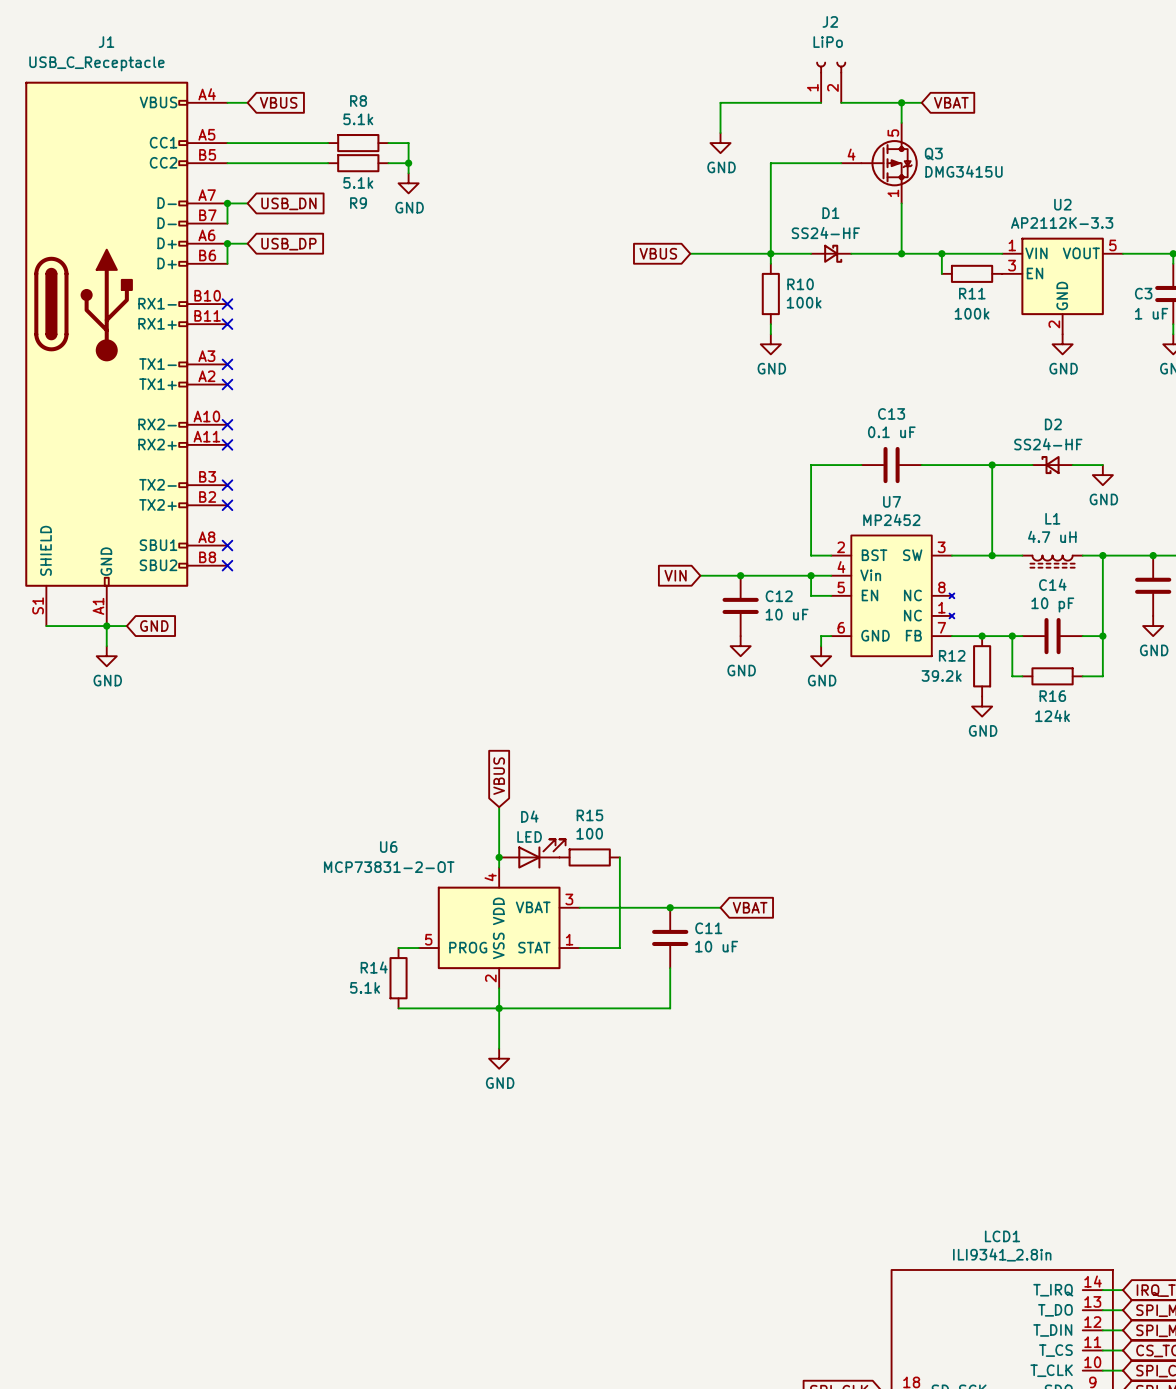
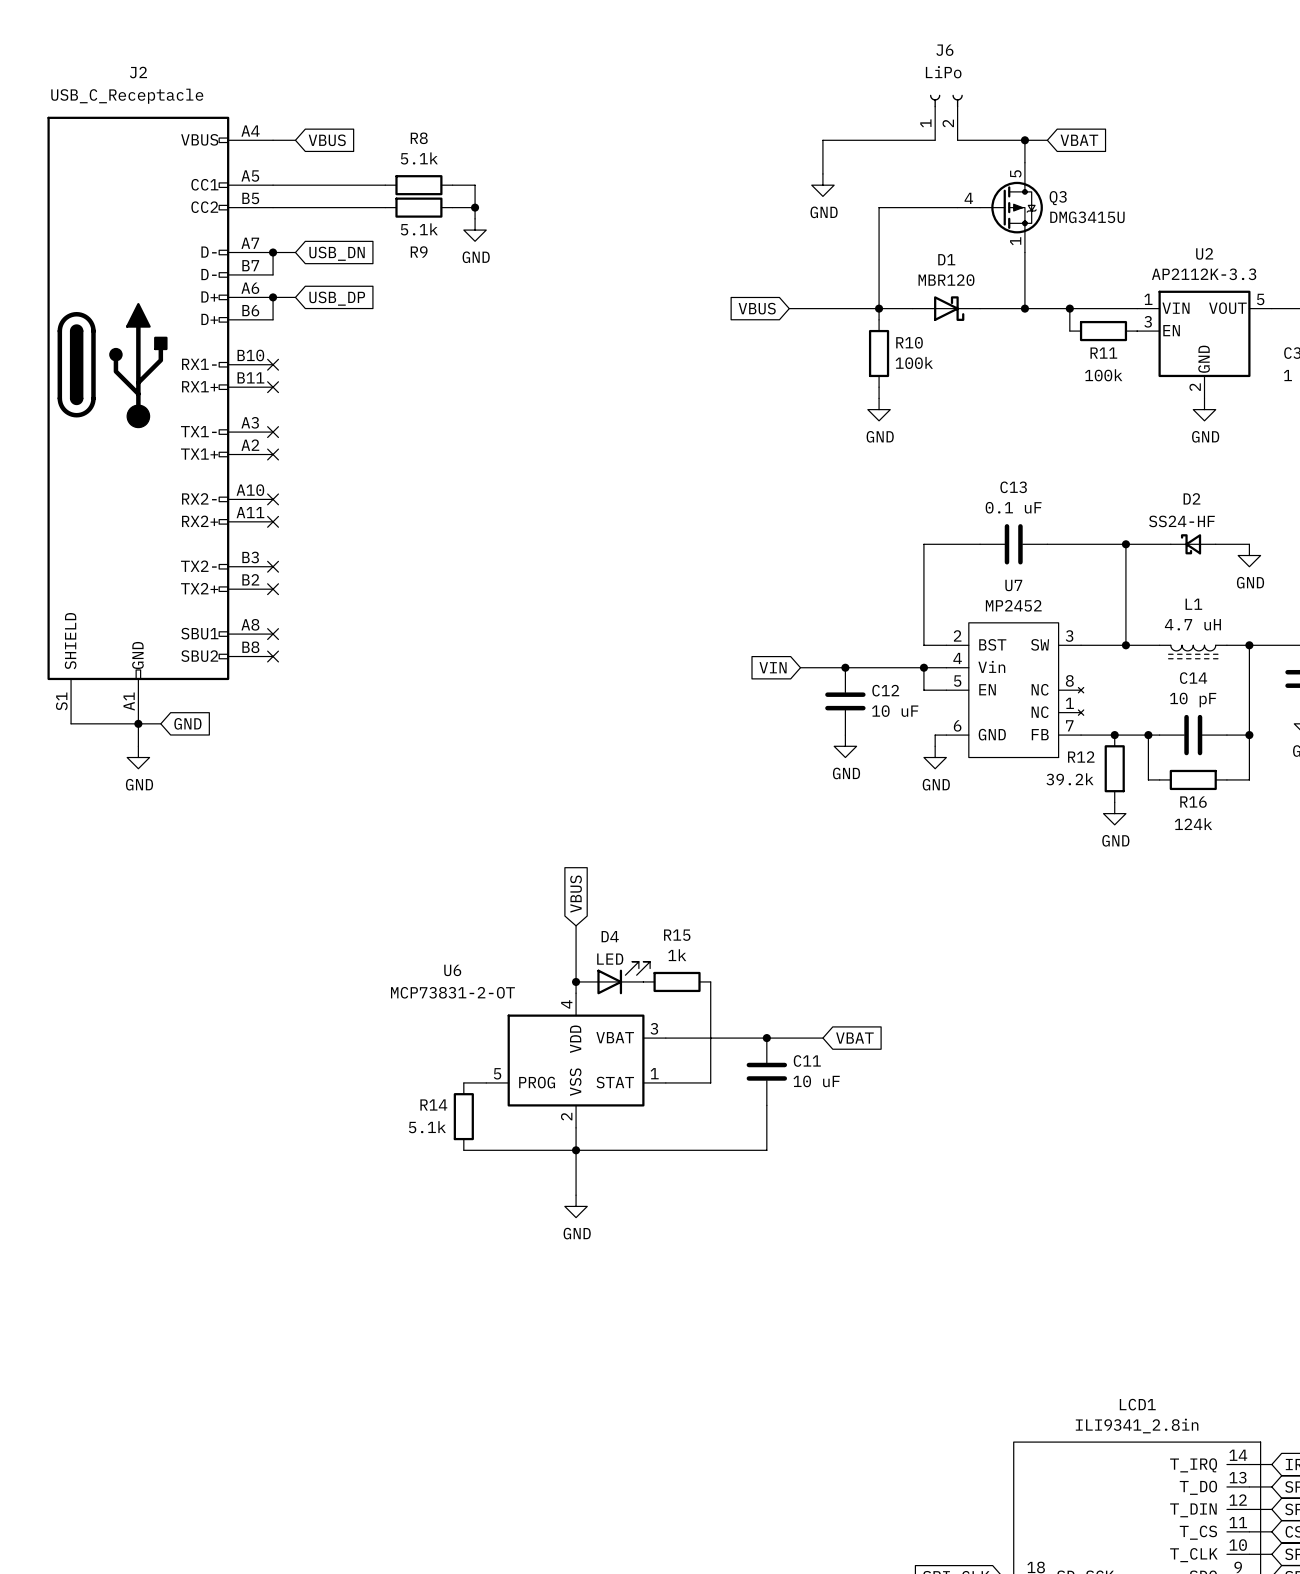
J2 name: J2 (830, 21) -> J6 (944, 50)
J1 name: J1 (106, 42) -> J2 (138, 72)
D1 value: SS24-HF (825, 233) -> MBR120 (946, 280)
D1 symbol: [811, 244, 852, 263] -> [912, 296, 981, 321]
R15 value: 100 (589, 833) -> 1k (677, 955)

